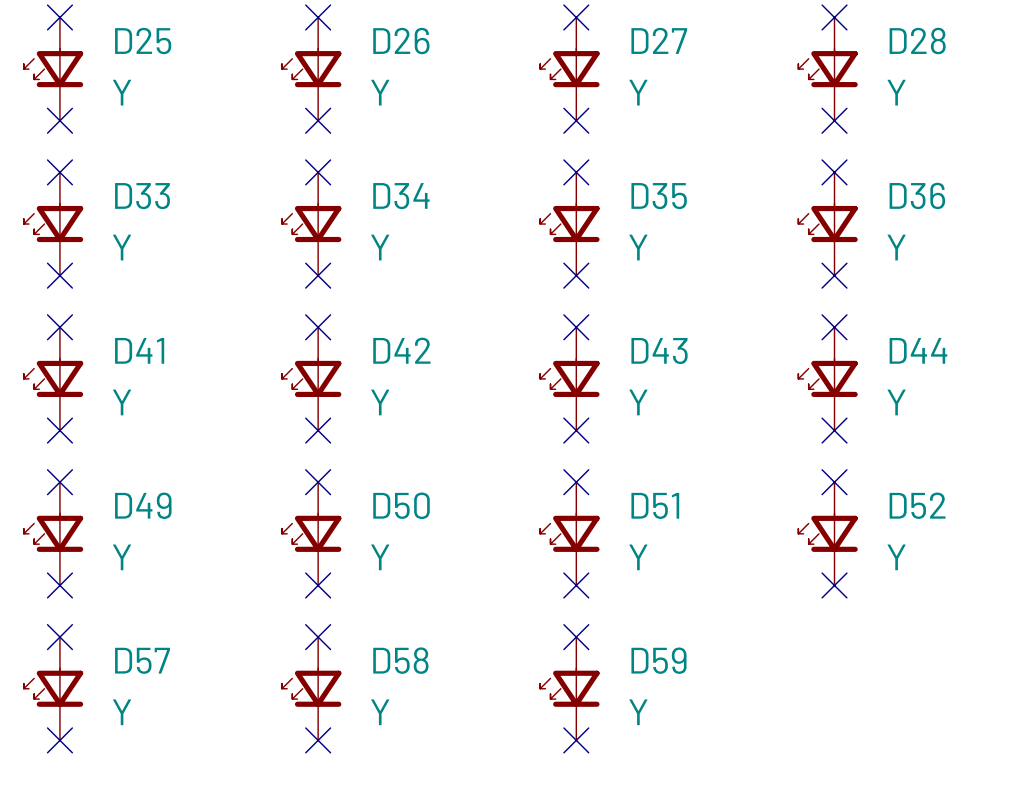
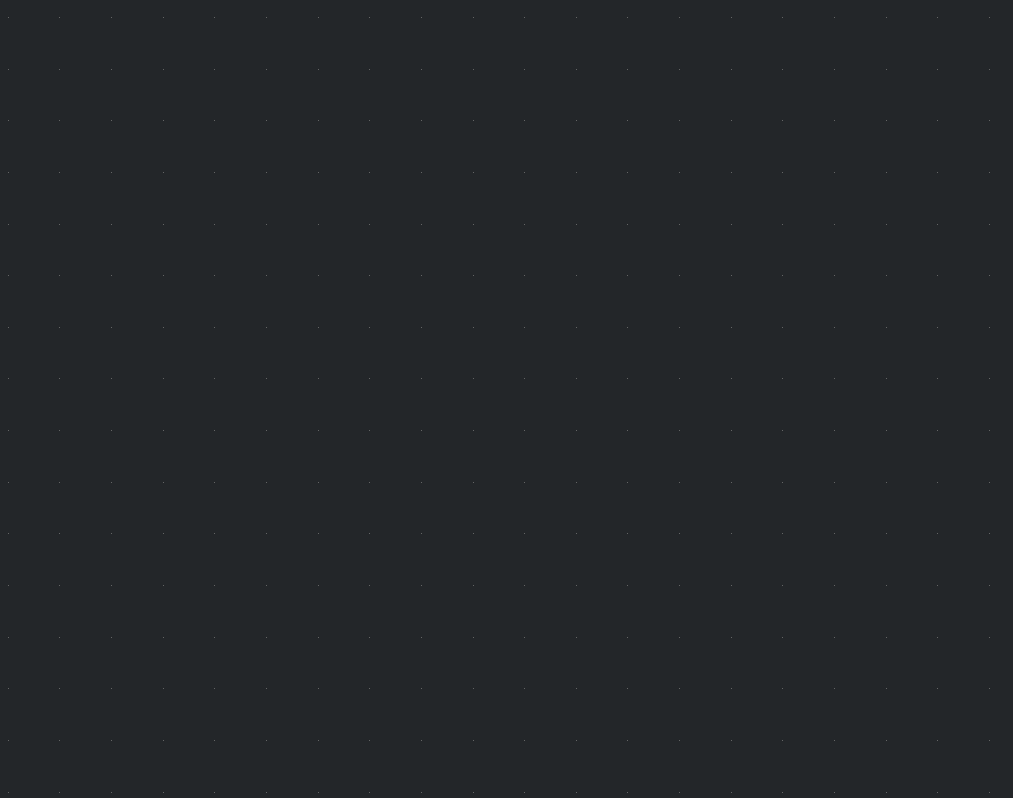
no-connect mark: (59, 17) -> none
no-connect mark: (318, 17) -> none
no-connect mark: (576, 17) -> none
no-connect mark: (834, 17) -> none
D25: Y (53, 69) -> none
D26: Y (311, 69) -> none
D27: Y (569, 69) -> none
D28: Y (828, 69) -> none
no-connect mark: (59, 120) -> none
no-connect mark: (318, 120) -> none
no-connect mark: (576, 120) -> none
no-connect mark: (834, 120) -> none
no-connect mark: (59, 172) -> none
no-connect mark: (318, 172) -> none
no-connect mark: (576, 172) -> none
no-connect mark: (834, 172) -> none
D33: Y (53, 224) -> none
D34: Y (311, 224) -> none
D35: Y (569, 224) -> none
D36: Y (828, 224) -> none
no-connect mark: (59, 275) -> none
no-connect mark: (318, 275) -> none
no-connect mark: (576, 275) -> none
no-connect mark: (834, 275) -> none
no-connect mark: (59, 327) -> none
no-connect mark: (318, 327) -> none
no-connect mark: (576, 327) -> none
no-connect mark: (834, 327) -> none
D41: Y (53, 378) -> none
D42: Y (311, 378) -> none
D43: Y (569, 378) -> none
D44: Y (828, 378) -> none
no-connect mark: (59, 430) -> none
no-connect mark: (318, 430) -> none
no-connect mark: (576, 430) -> none
no-connect mark: (834, 430) -> none
no-connect mark: (59, 482) -> none
no-connect mark: (318, 482) -> none
no-connect mark: (576, 482) -> none
no-connect mark: (834, 482) -> none
D49: Y (53, 533) -> none
D50: Y (311, 533) -> none
D51: Y (569, 533) -> none
D52: Y (828, 533) -> none
no-connect mark: (59, 585) -> none
no-connect mark: (318, 585) -> none
no-connect mark: (576, 585) -> none
no-connect mark: (834, 585) -> none
no-connect mark: (59, 637) -> none
no-connect mark: (318, 637) -> none
no-connect mark: (576, 637) -> none
D57: Y (53, 688) -> none
D58: Y (311, 688) -> none
D59: Y (569, 688) -> none
no-connect mark: (59, 740) -> none
no-connect mark: (318, 740) -> none
no-connect mark: (576, 740) -> none

